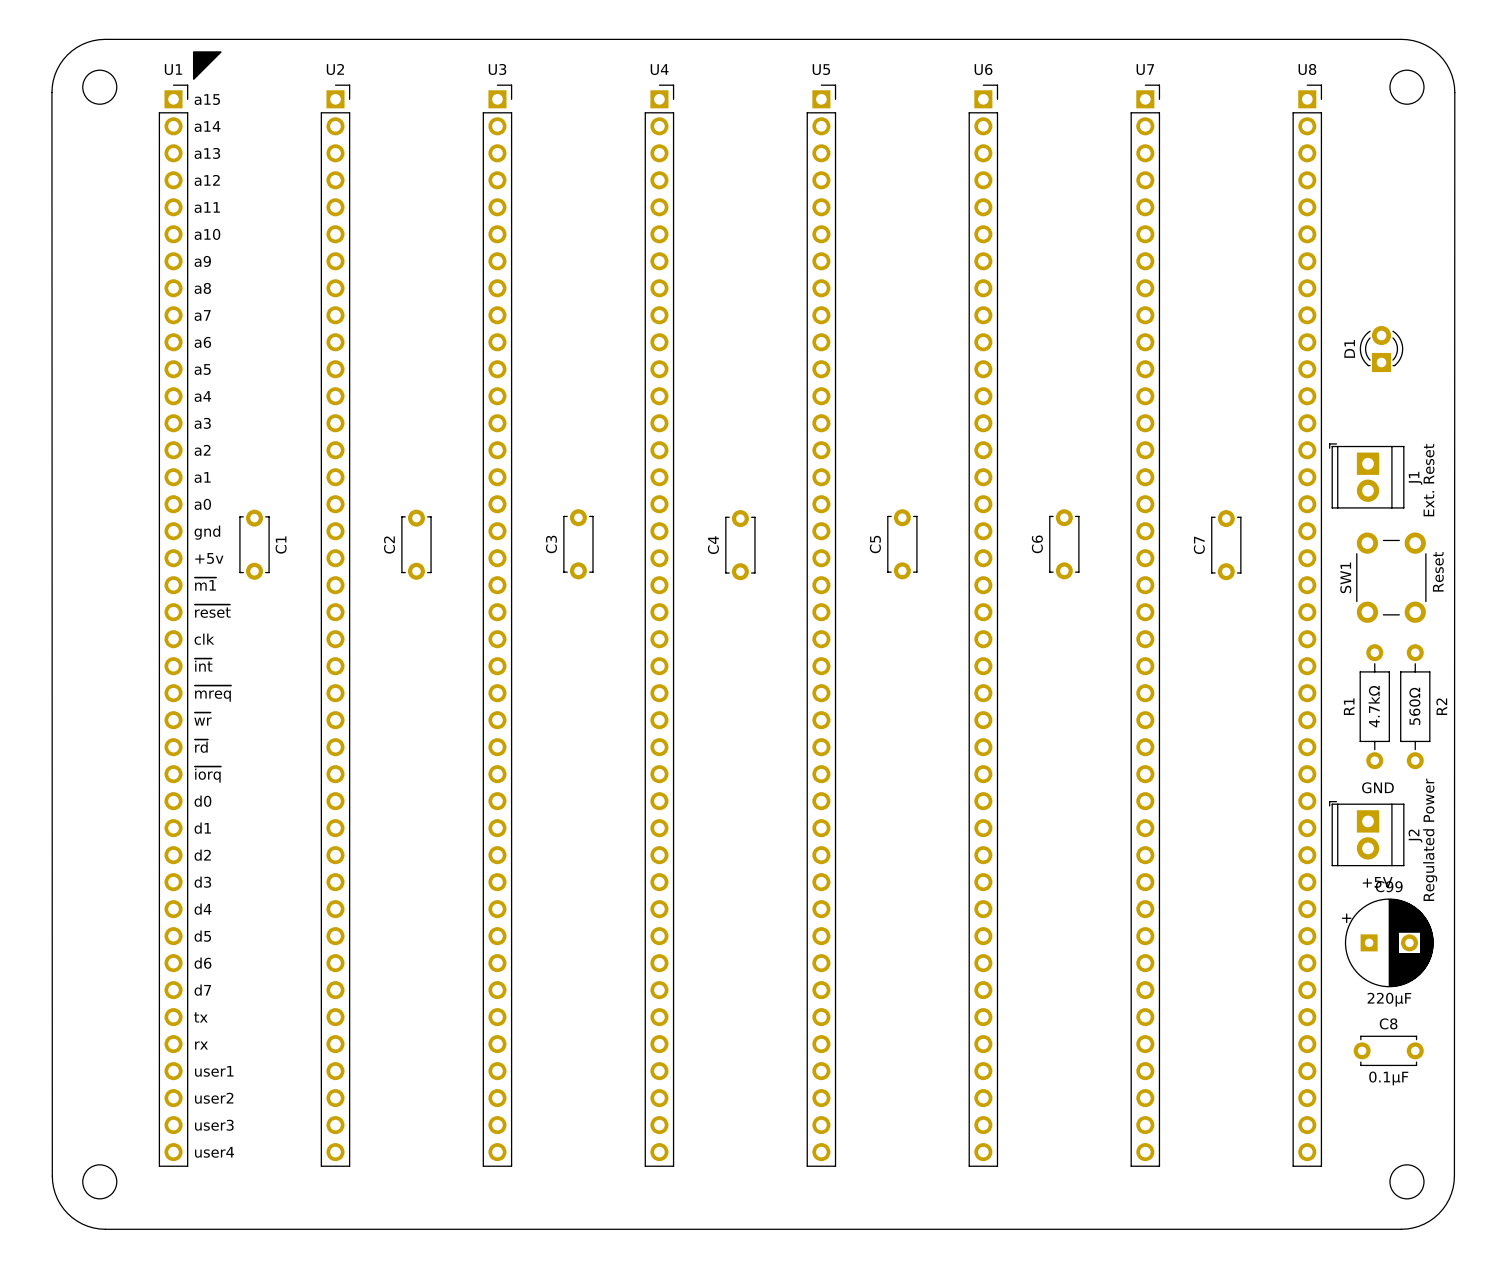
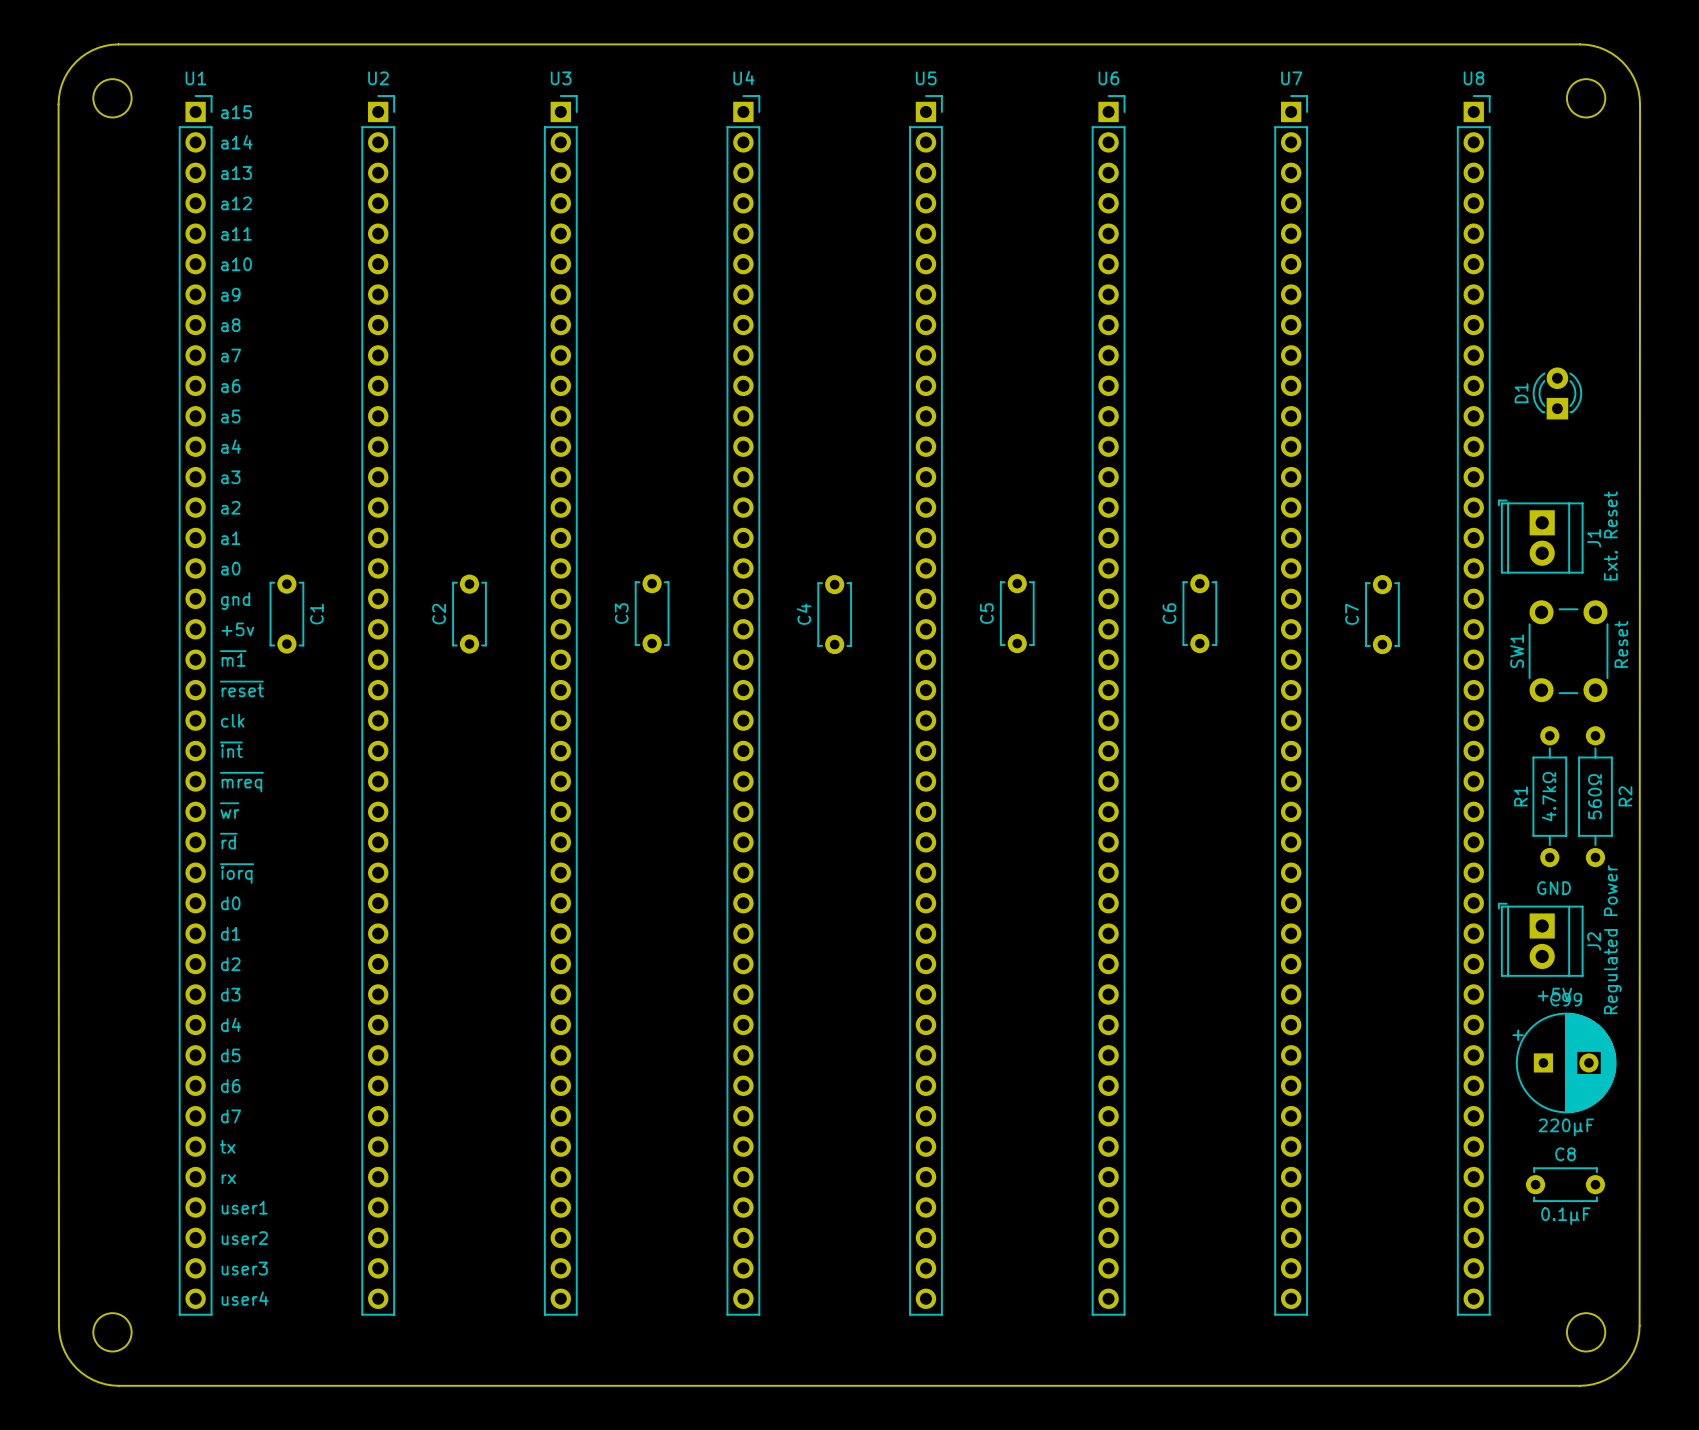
drawing: [192, 51, 222, 80] -> none

